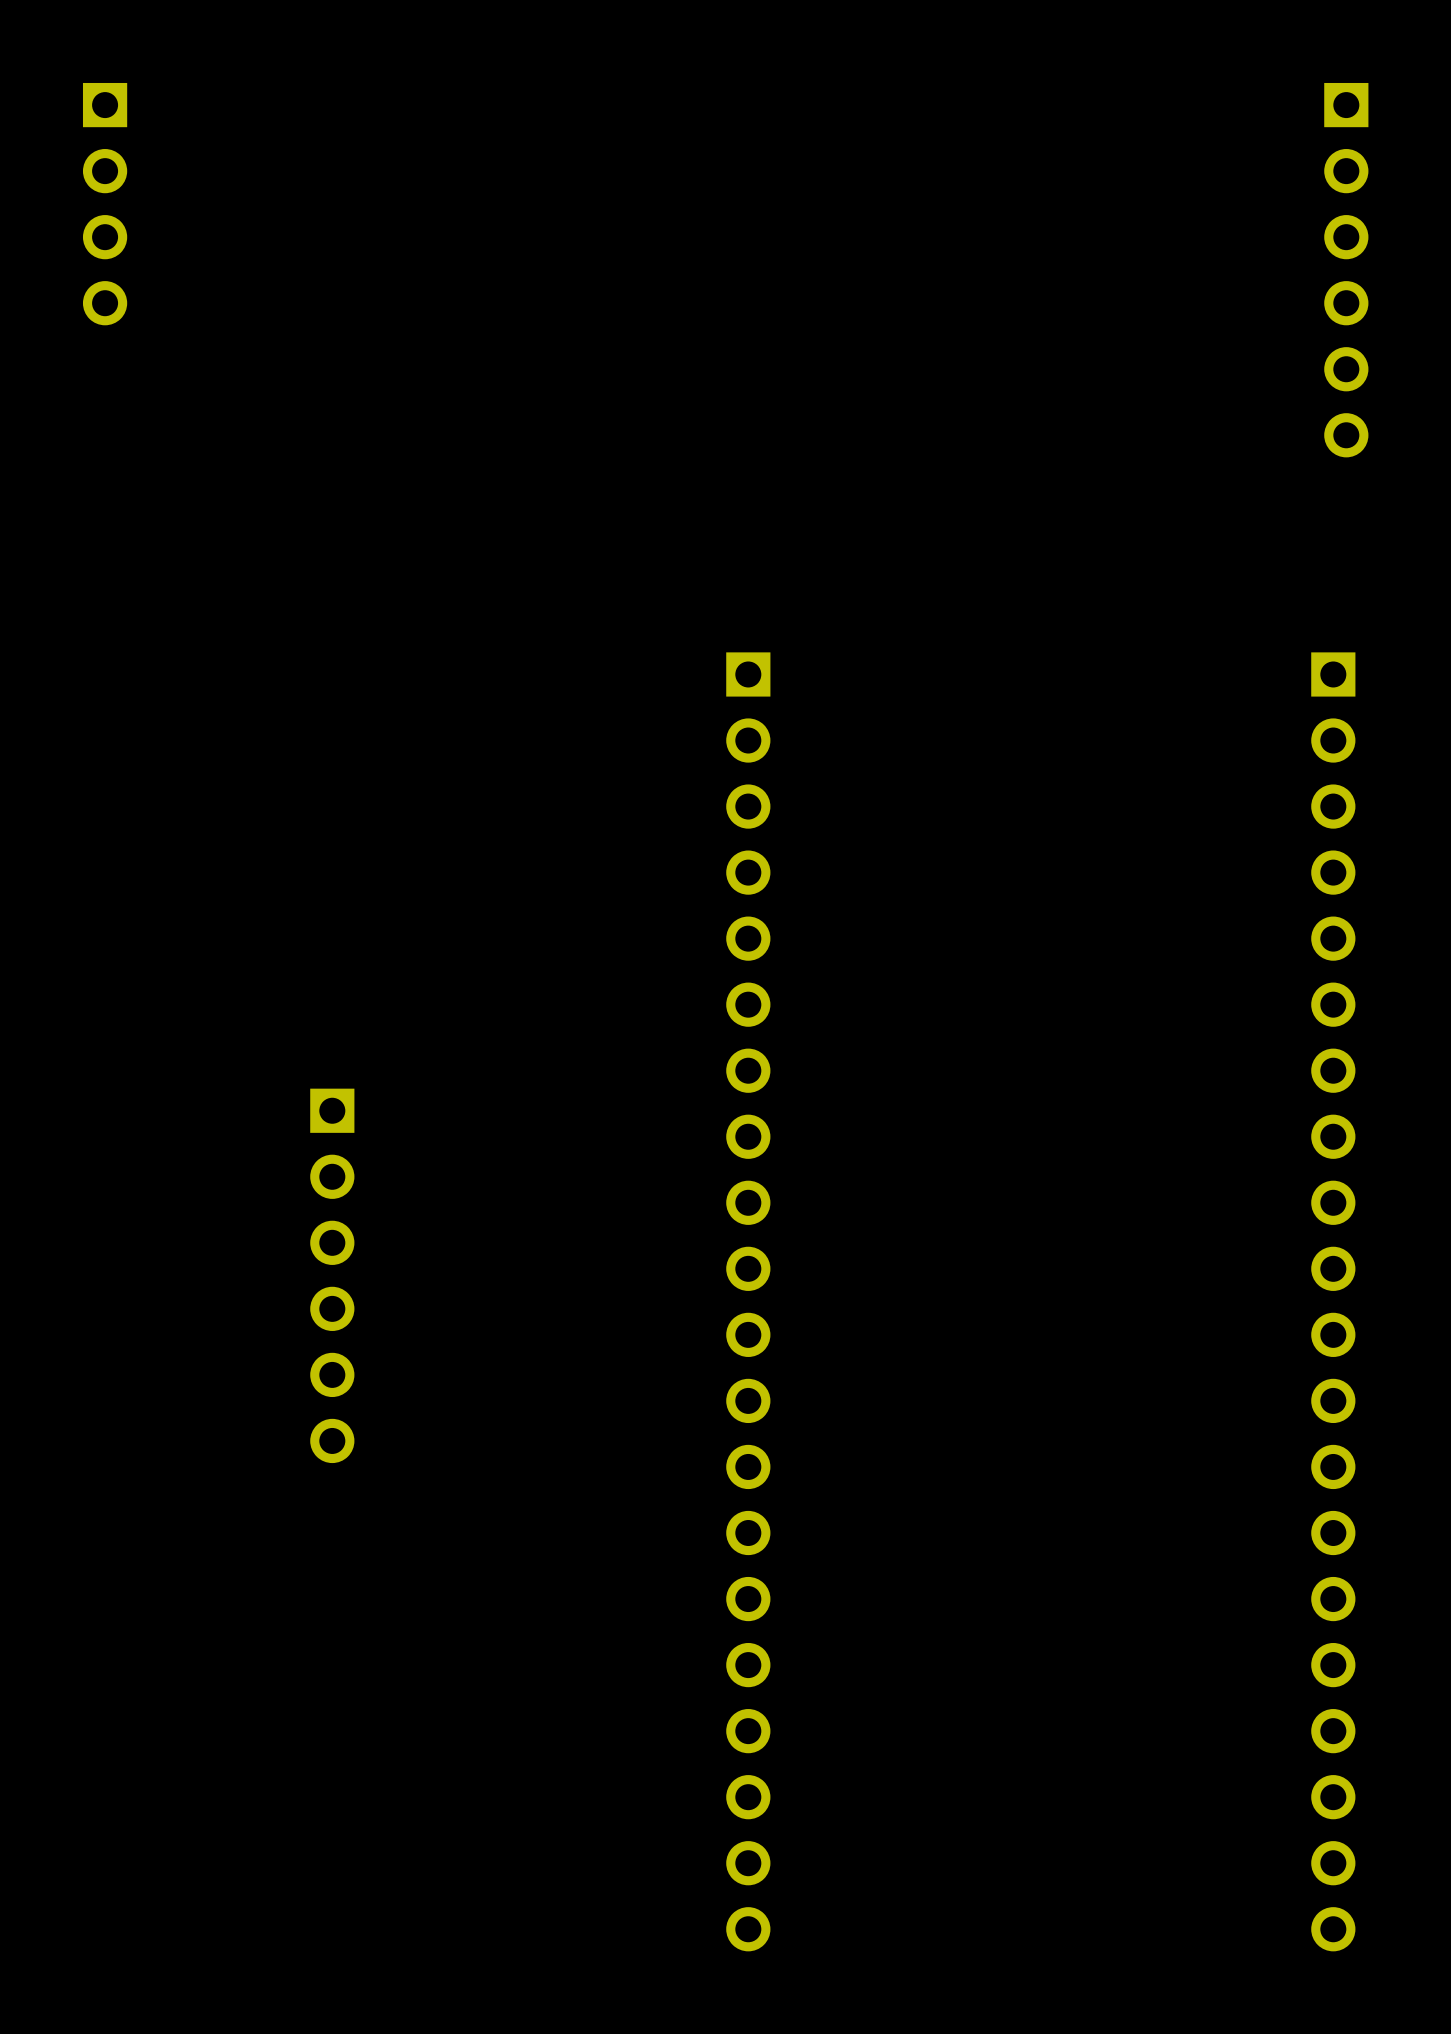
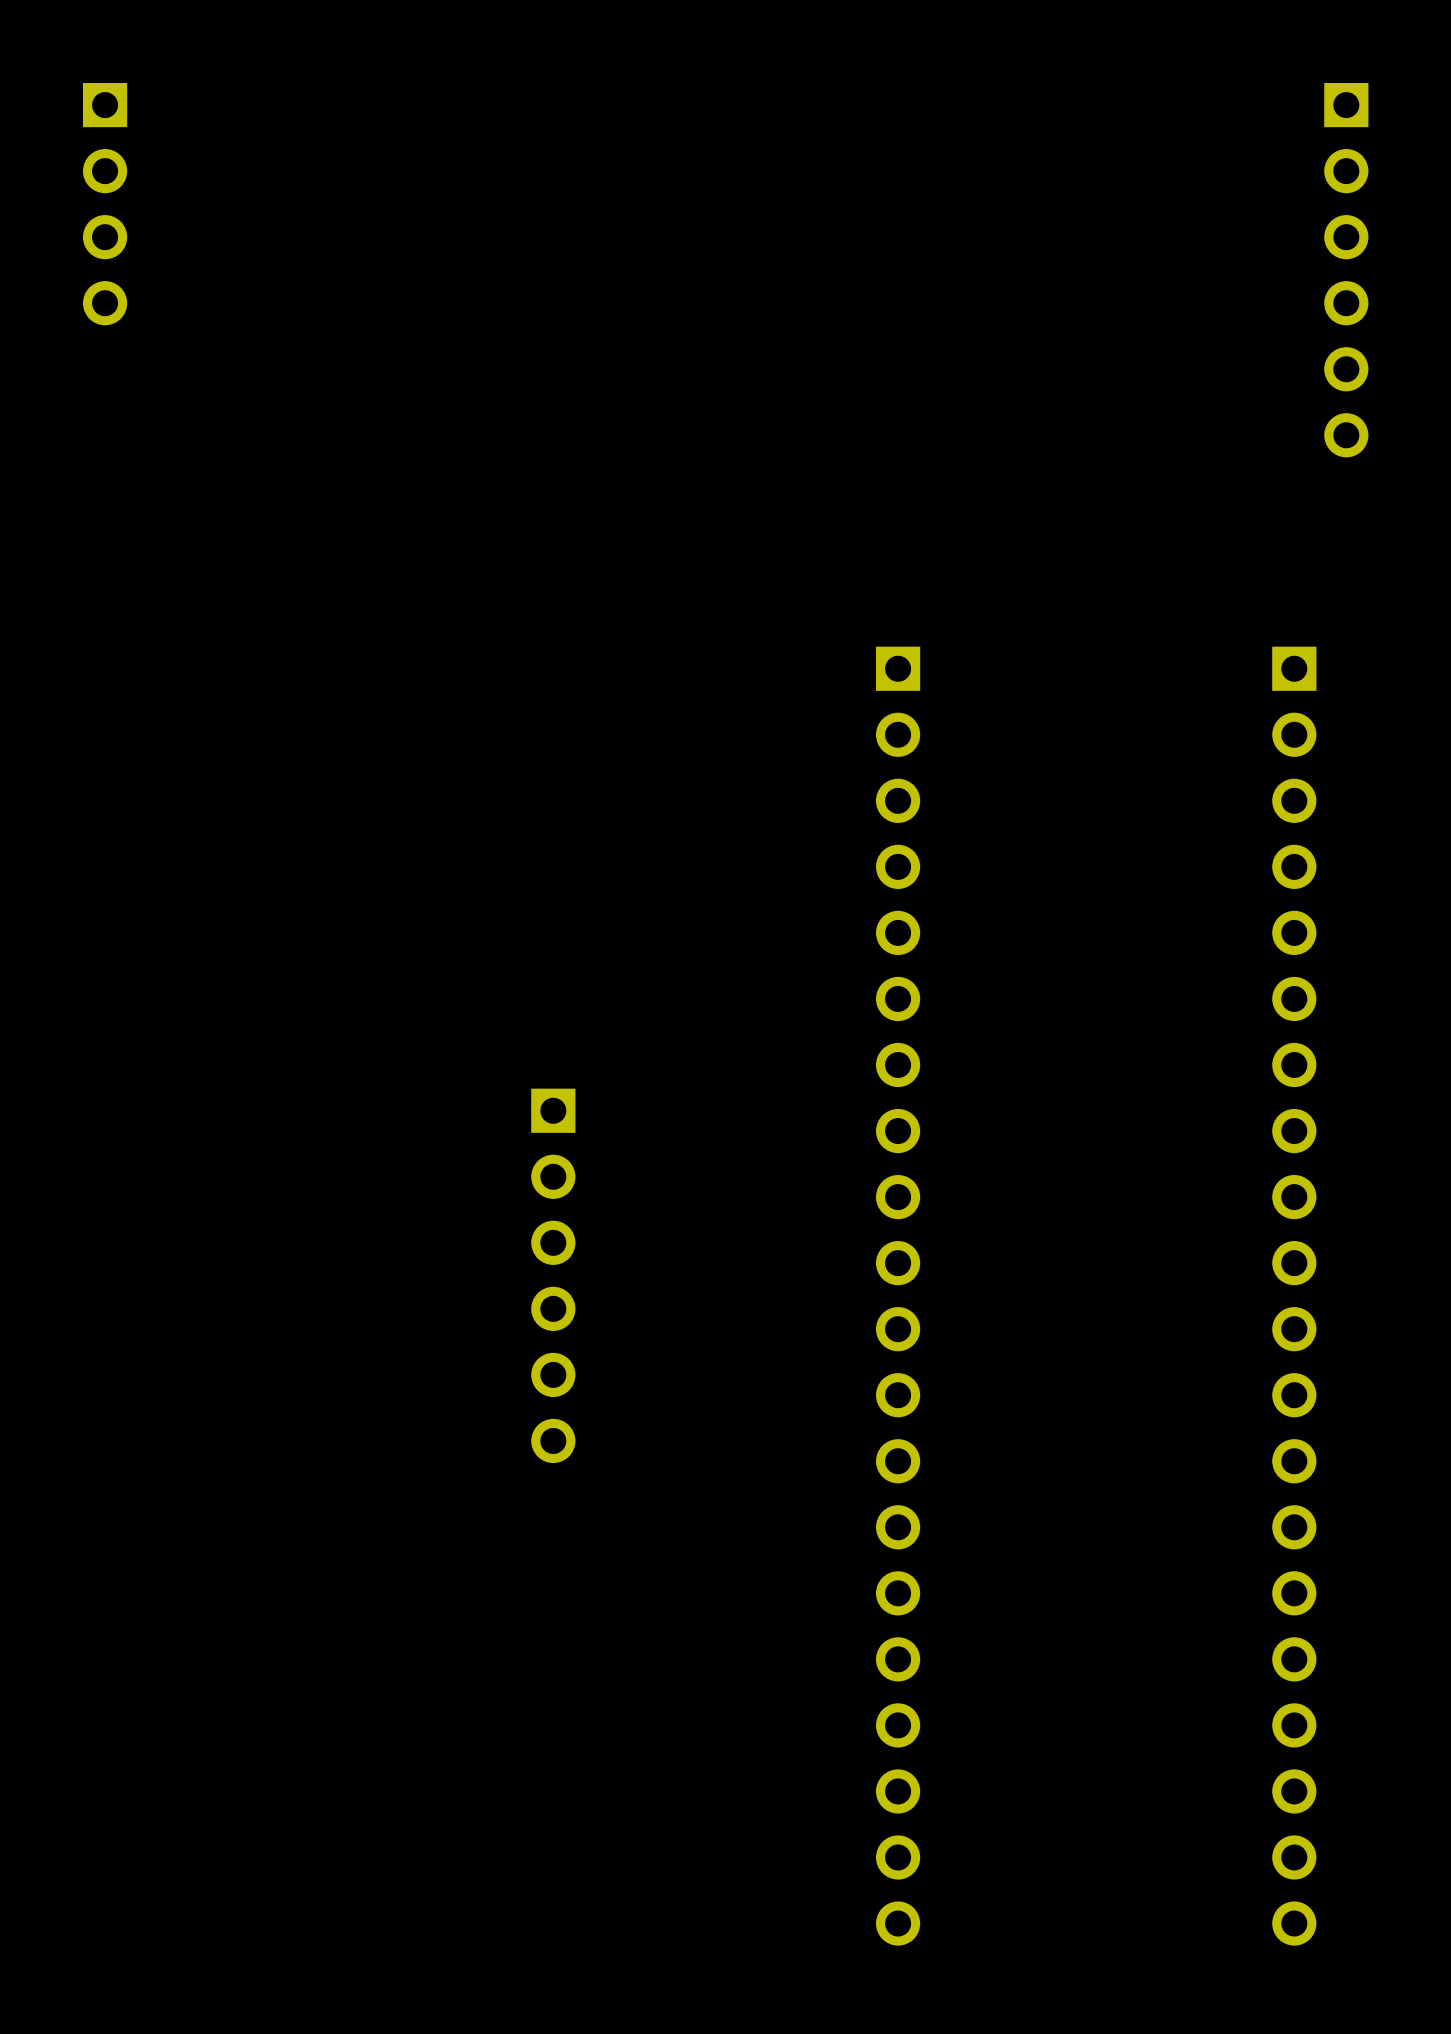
part position: (332, 1275) -> (553, 1275)
part position: (748, 1301) -> (898, 1296)
part position: (1333, 1301) -> (1294, 1296)

